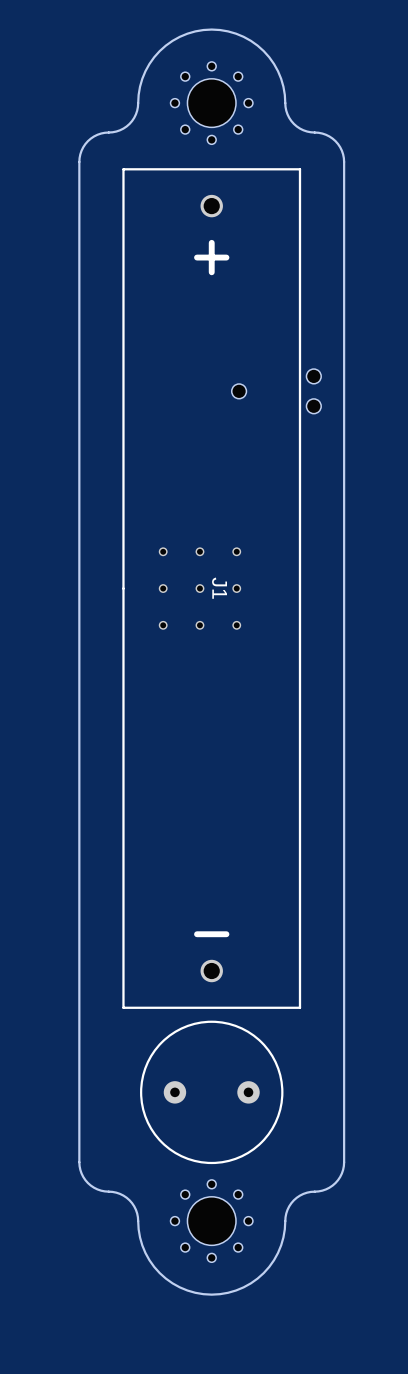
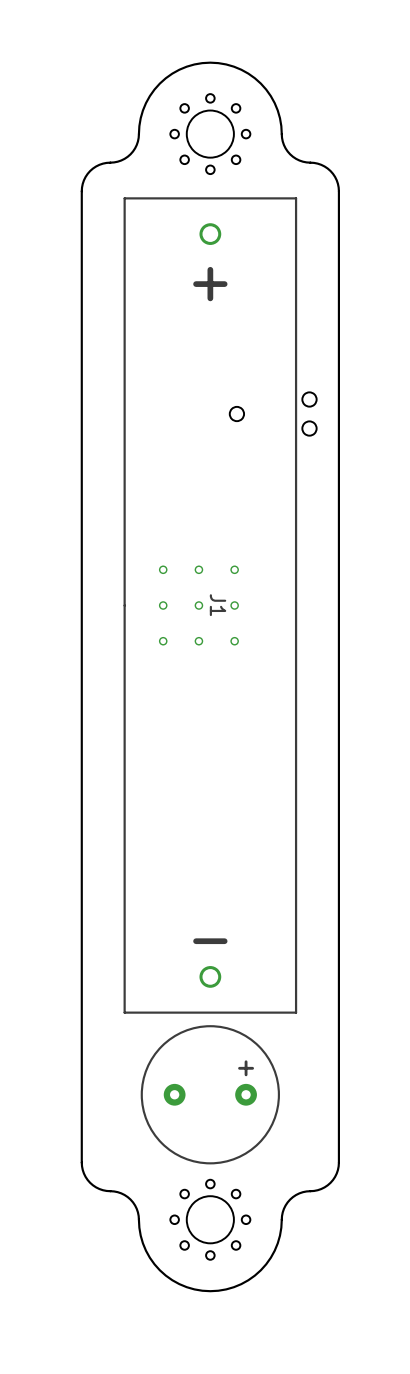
text: none -> + (246, 1068)

